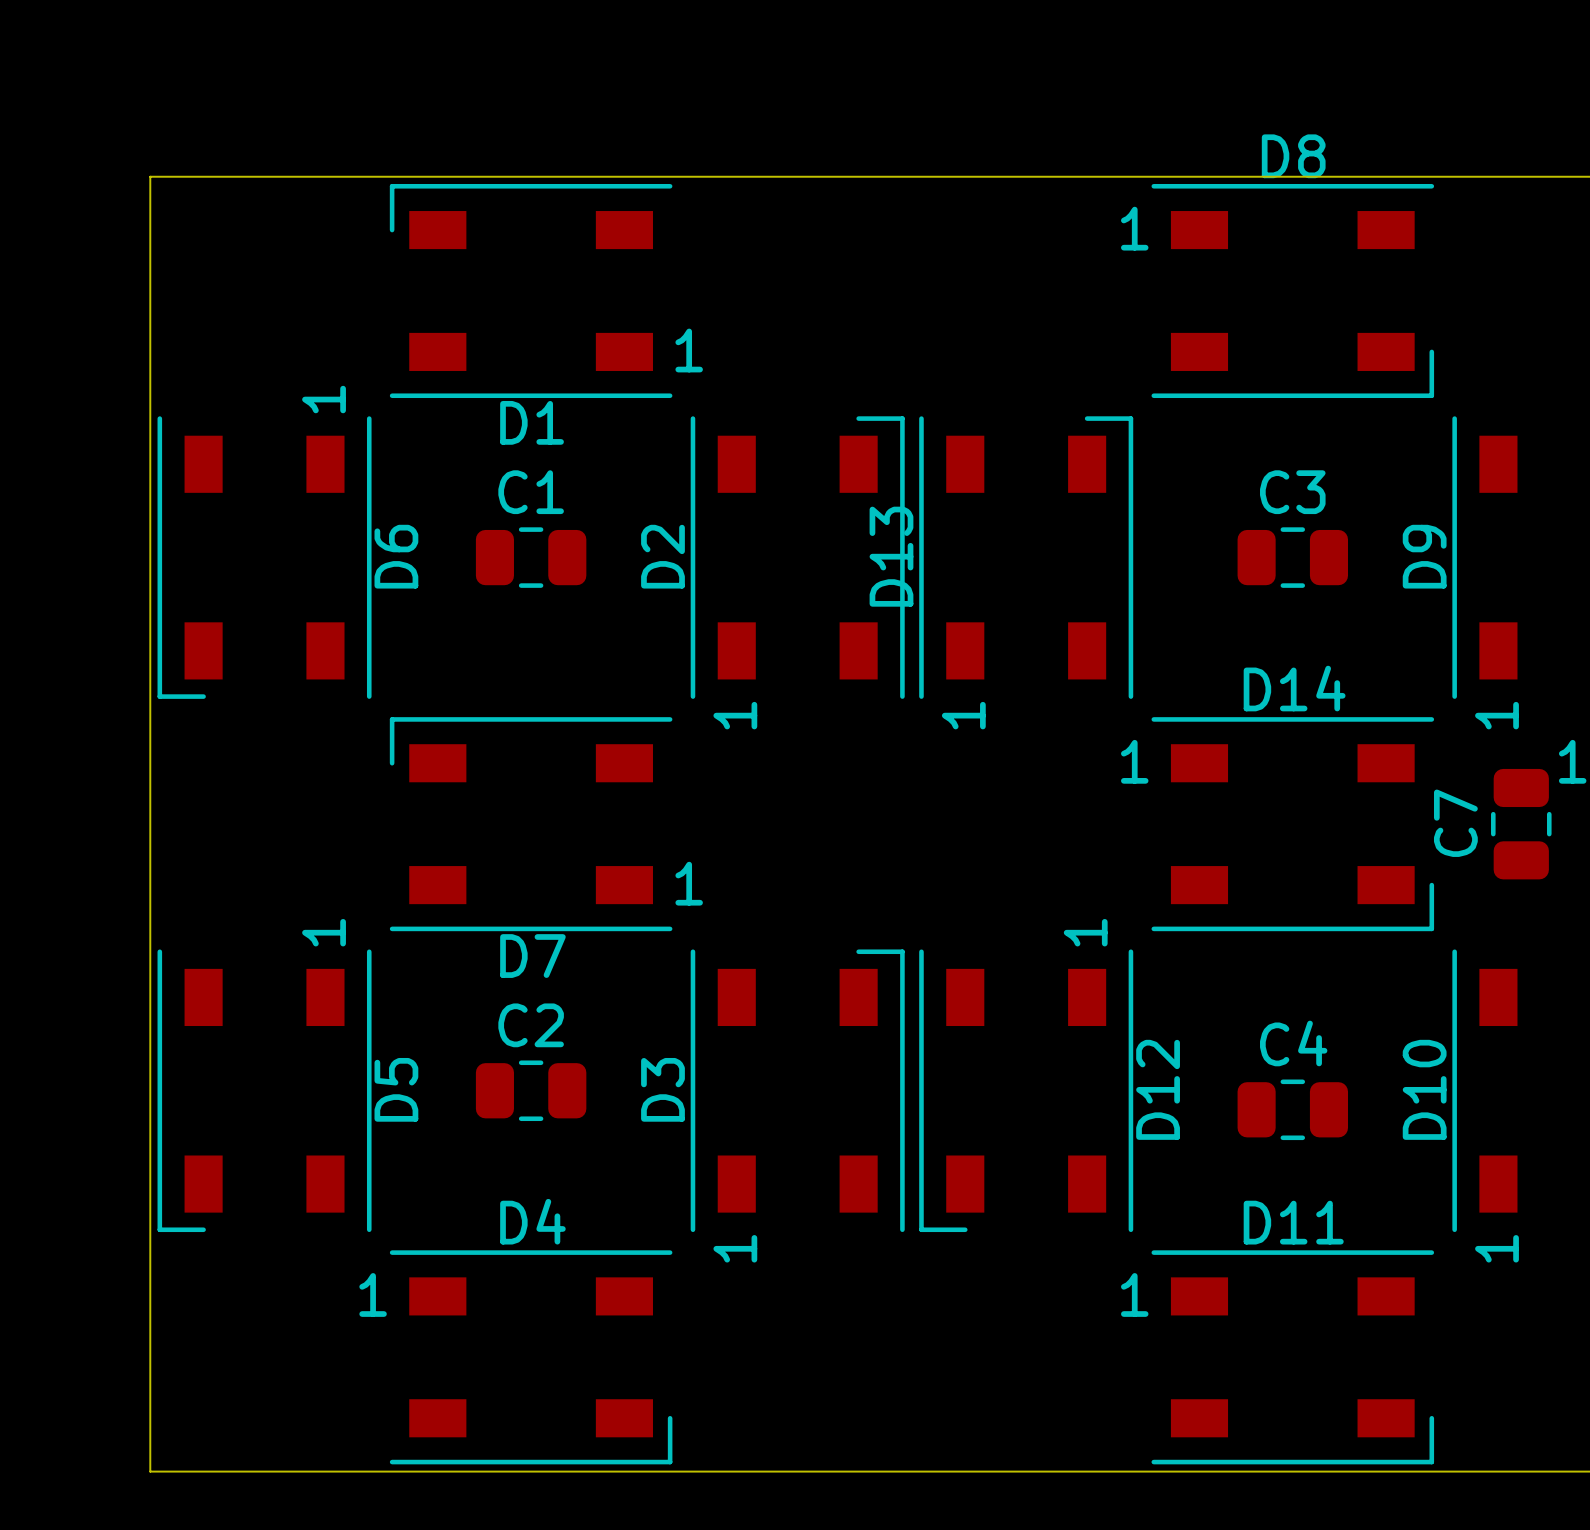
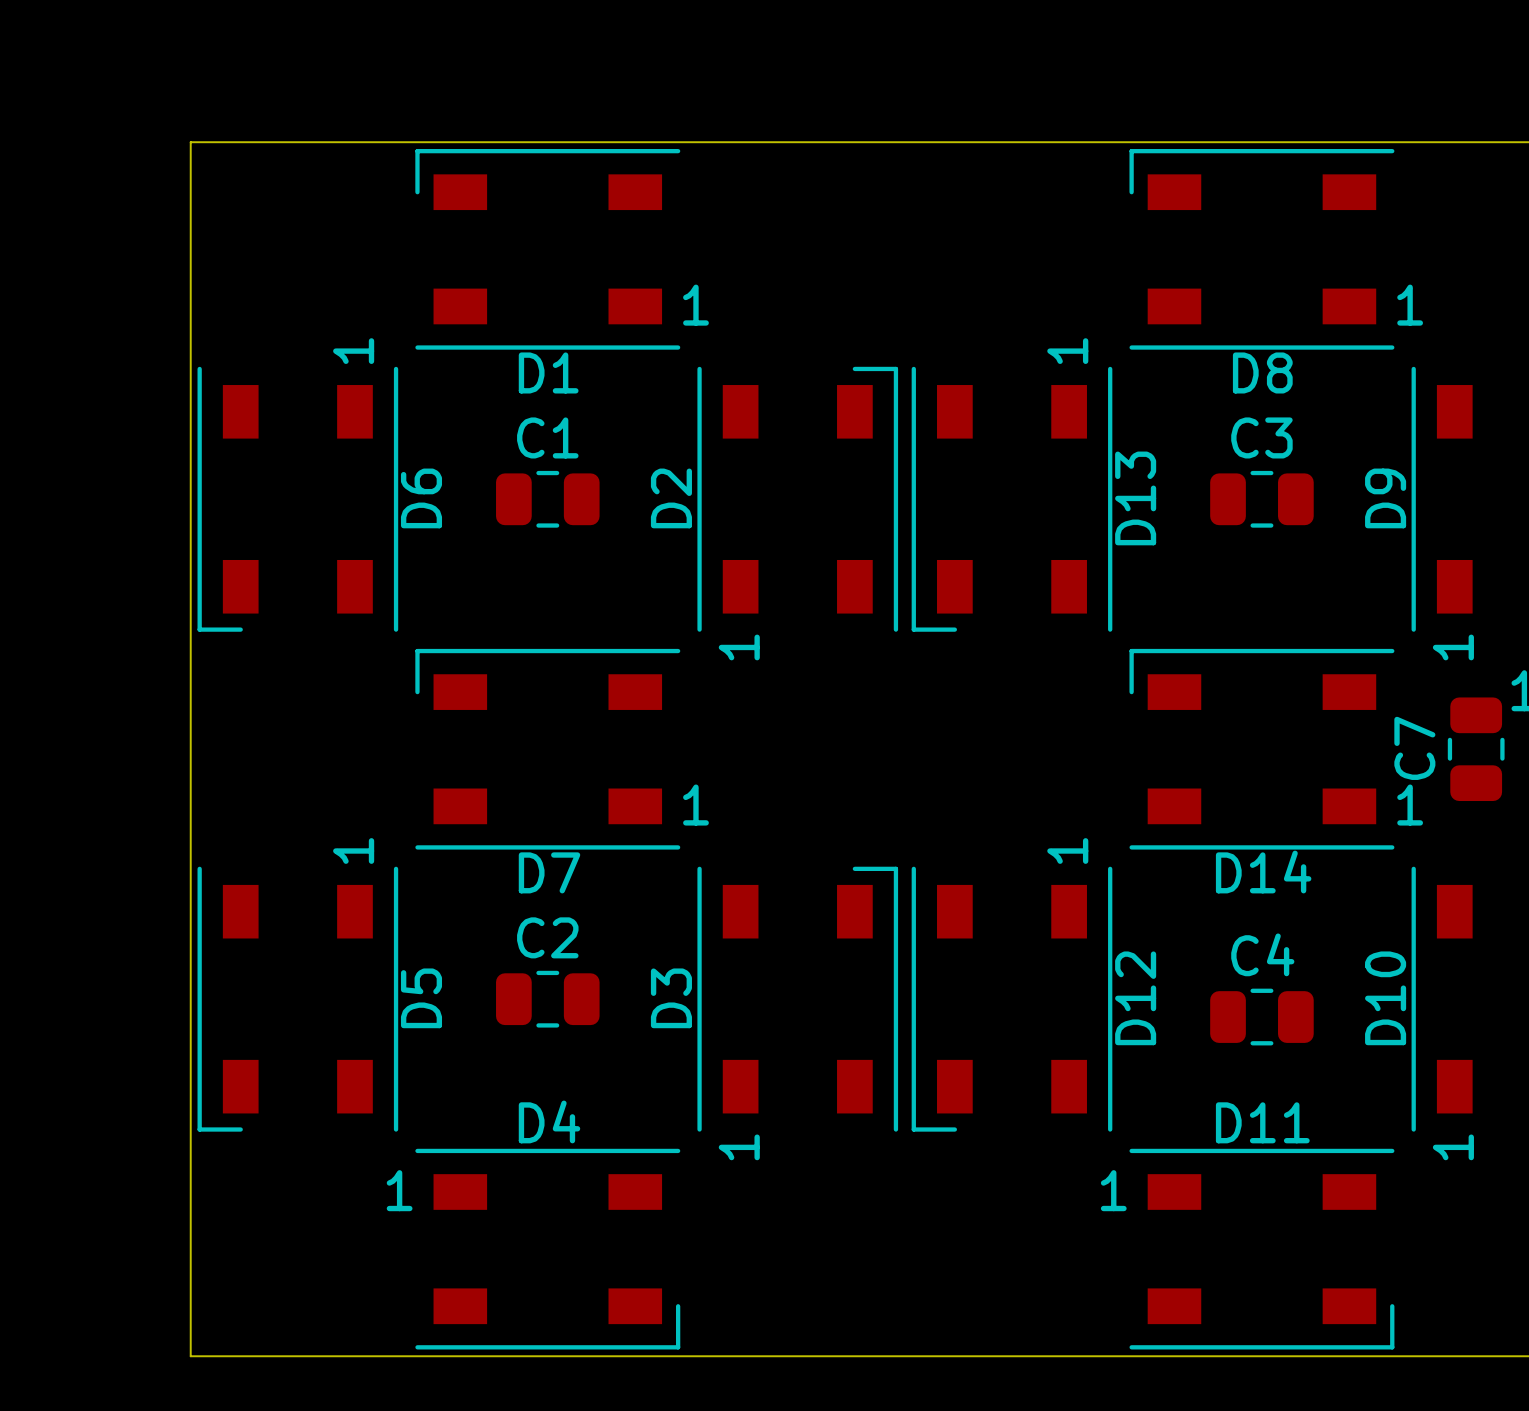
D8 rotation: 0° (1292, 291) -> 180° (1261, 249)
D13 rotation: 0° (1026, 557) -> 180° (1011, 499)
D14 rotation: 0° (1292, 824) -> 180° (1261, 749)

